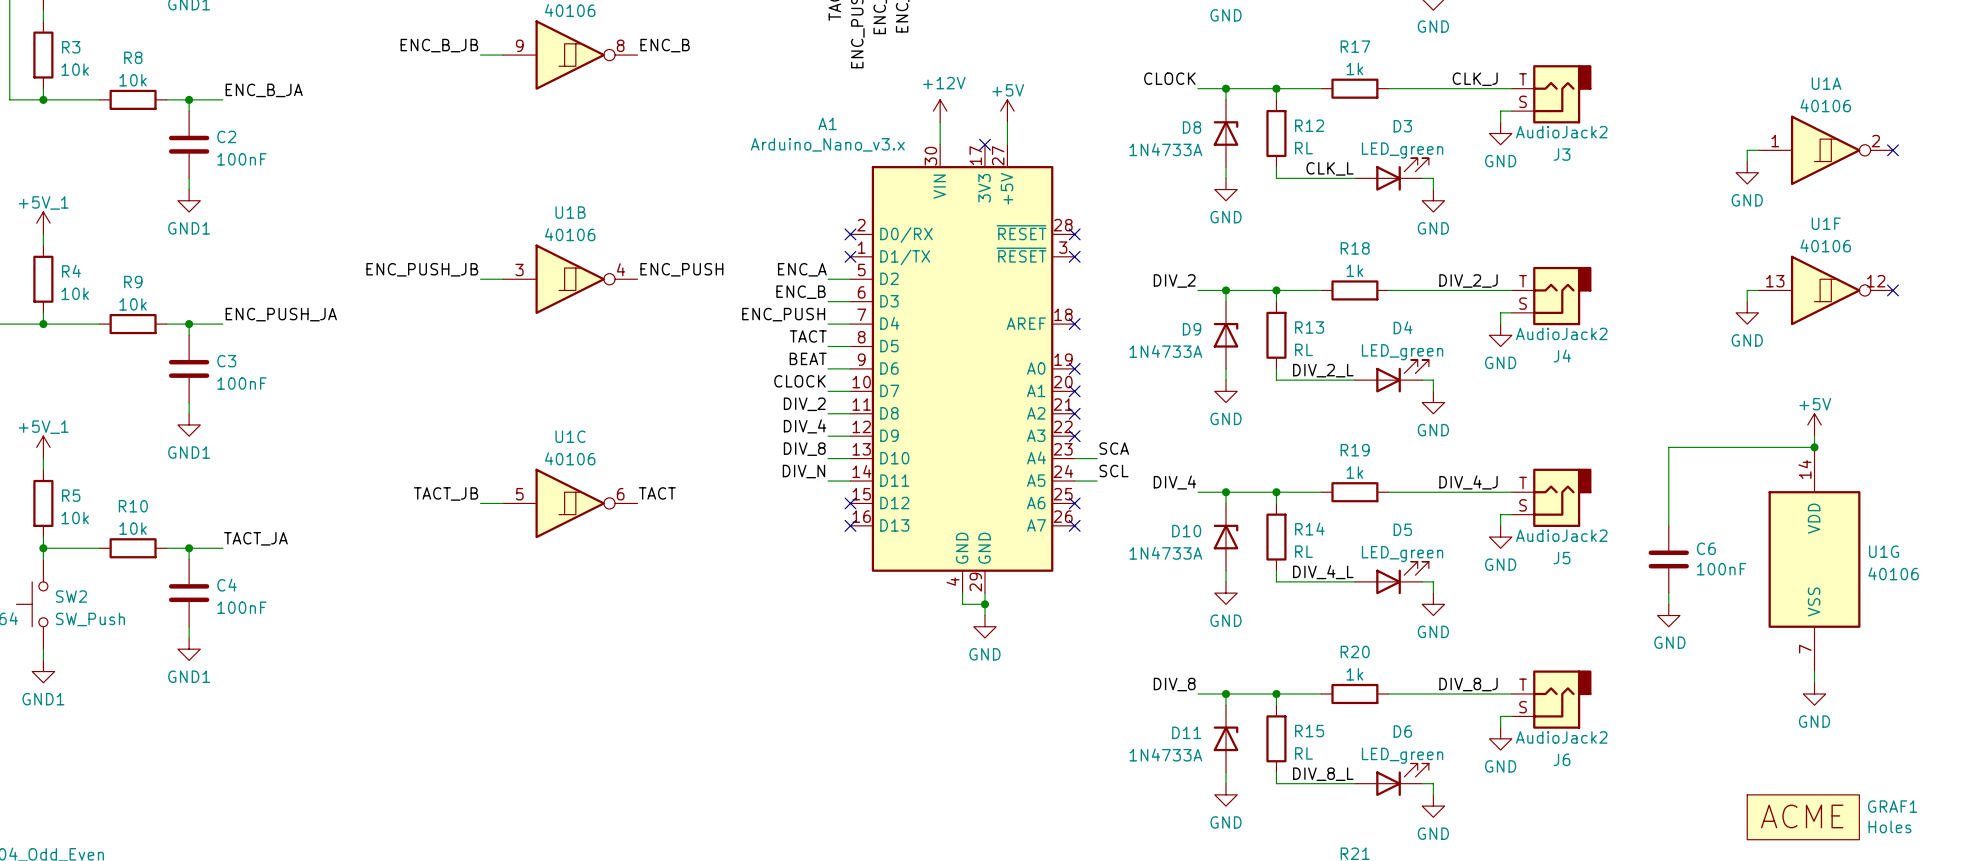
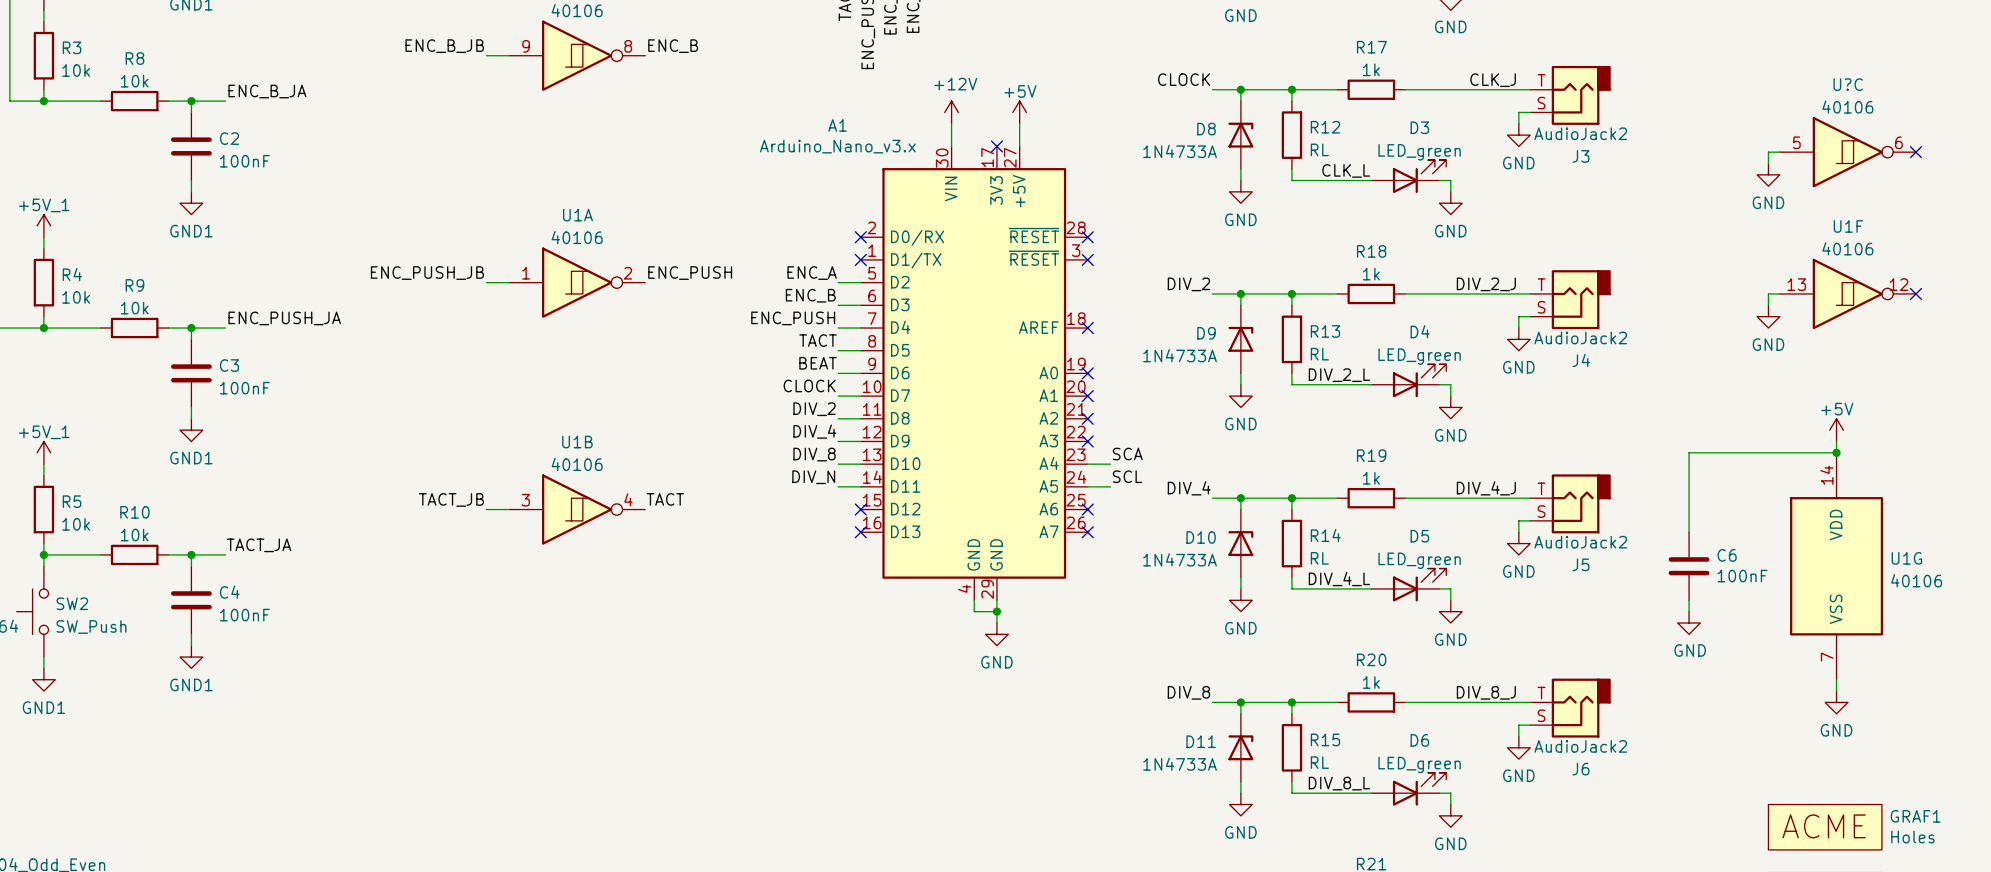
U1A position: (1825, 150) -> (577, 282)
U?C: none -> 40106 (1847, 152)
U1B position: (570, 279) -> (577, 509)
U1C: 40106 (570, 503) -> none

